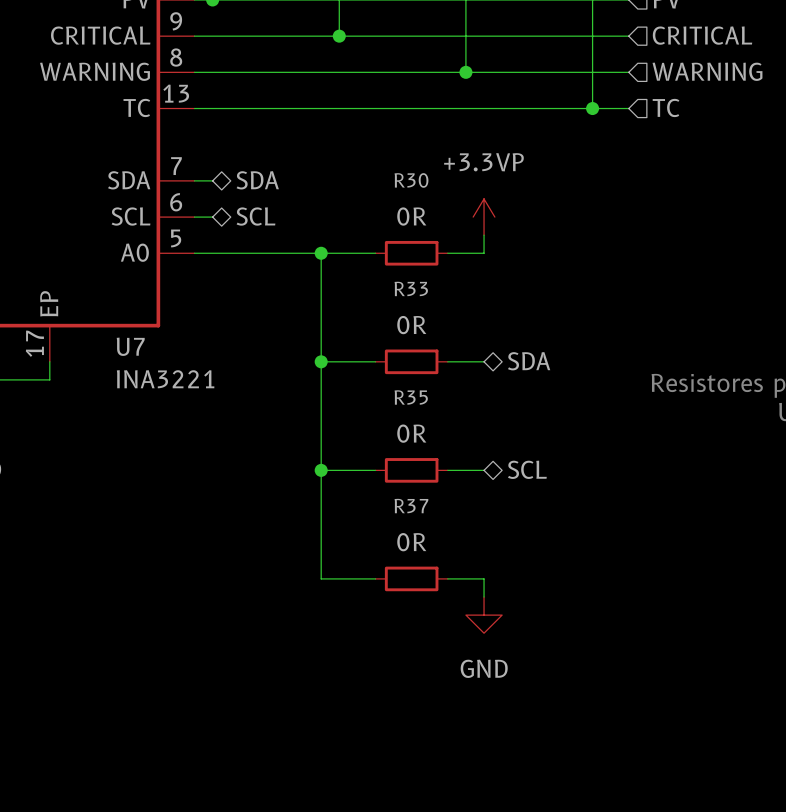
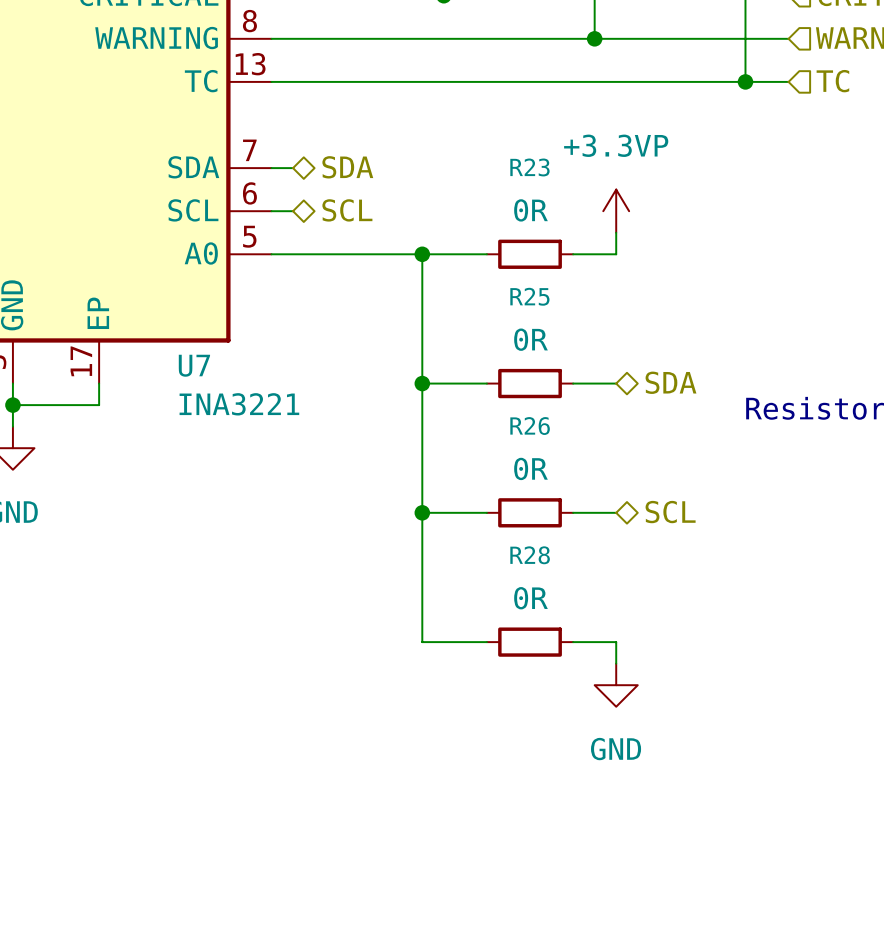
R30 name: R30 (411, 180) -> R23 (529, 167)
R33 name: R33 (411, 288) -> R25 (529, 296)
R35 name: R35 (411, 397) -> R26 (530, 426)
R37 name: R37 (411, 506) -> R28 (530, 555)

